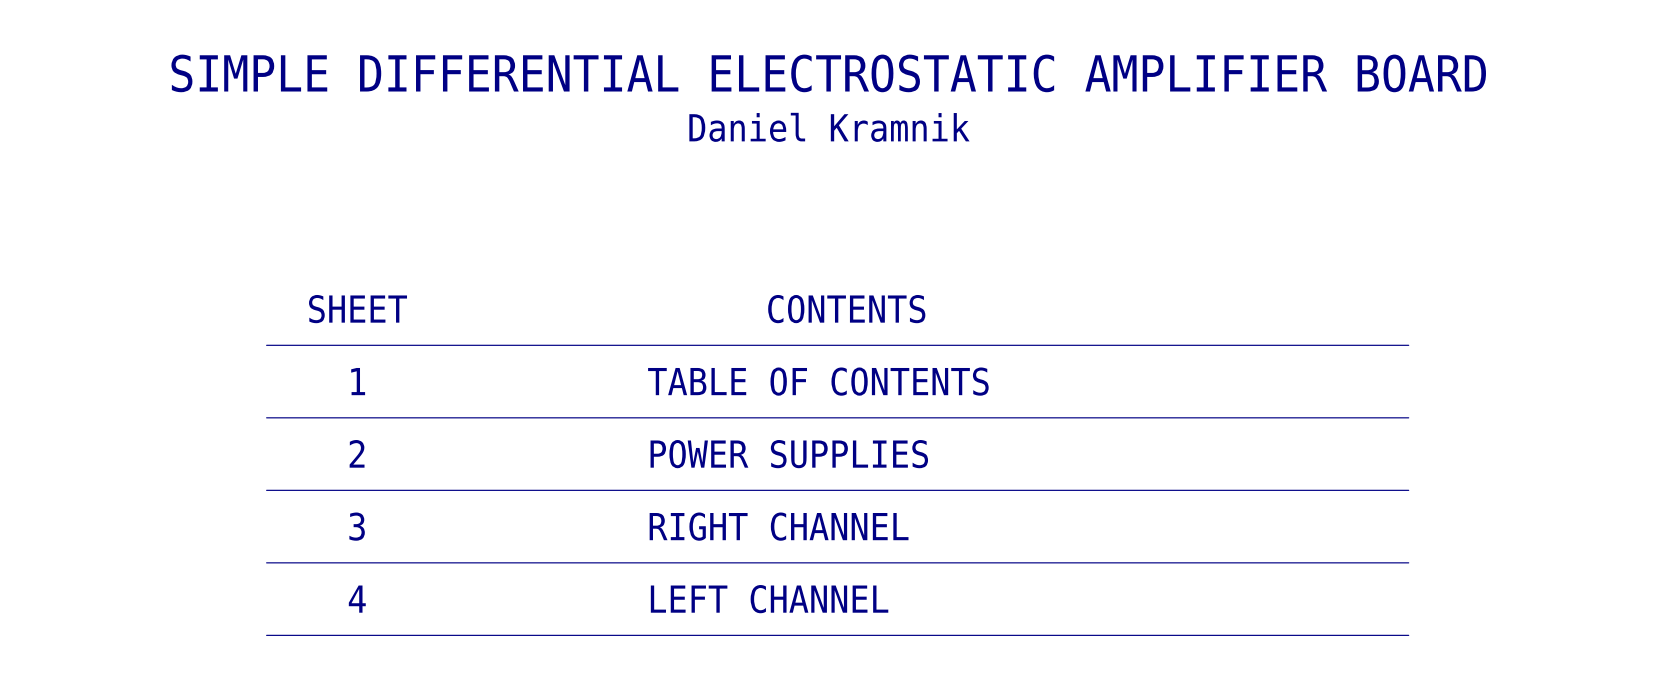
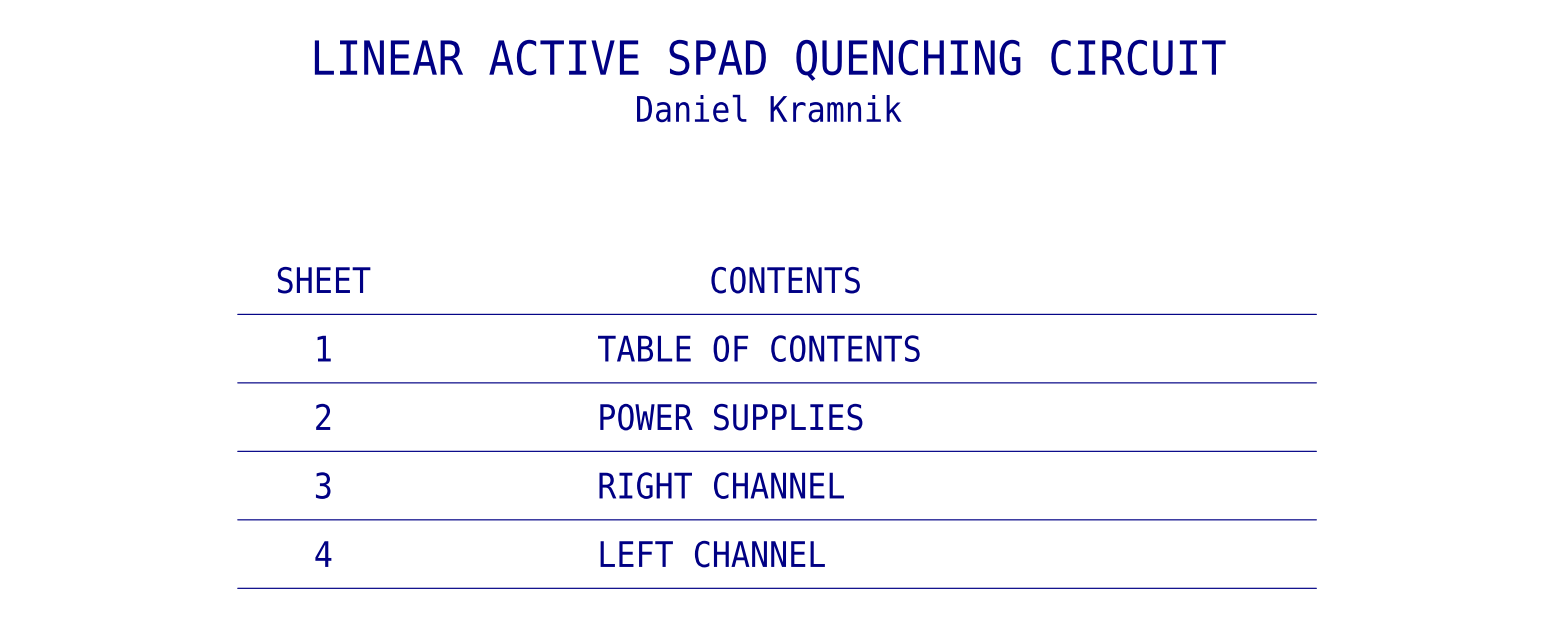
text: SIMPLE DIFFERENTIAL ELECTROSTATIC AMPLIFIER BOARD (828, 73) -> LINEAR ACTIVE SPAD QUENCHING CIRCUIT (770, 60)

